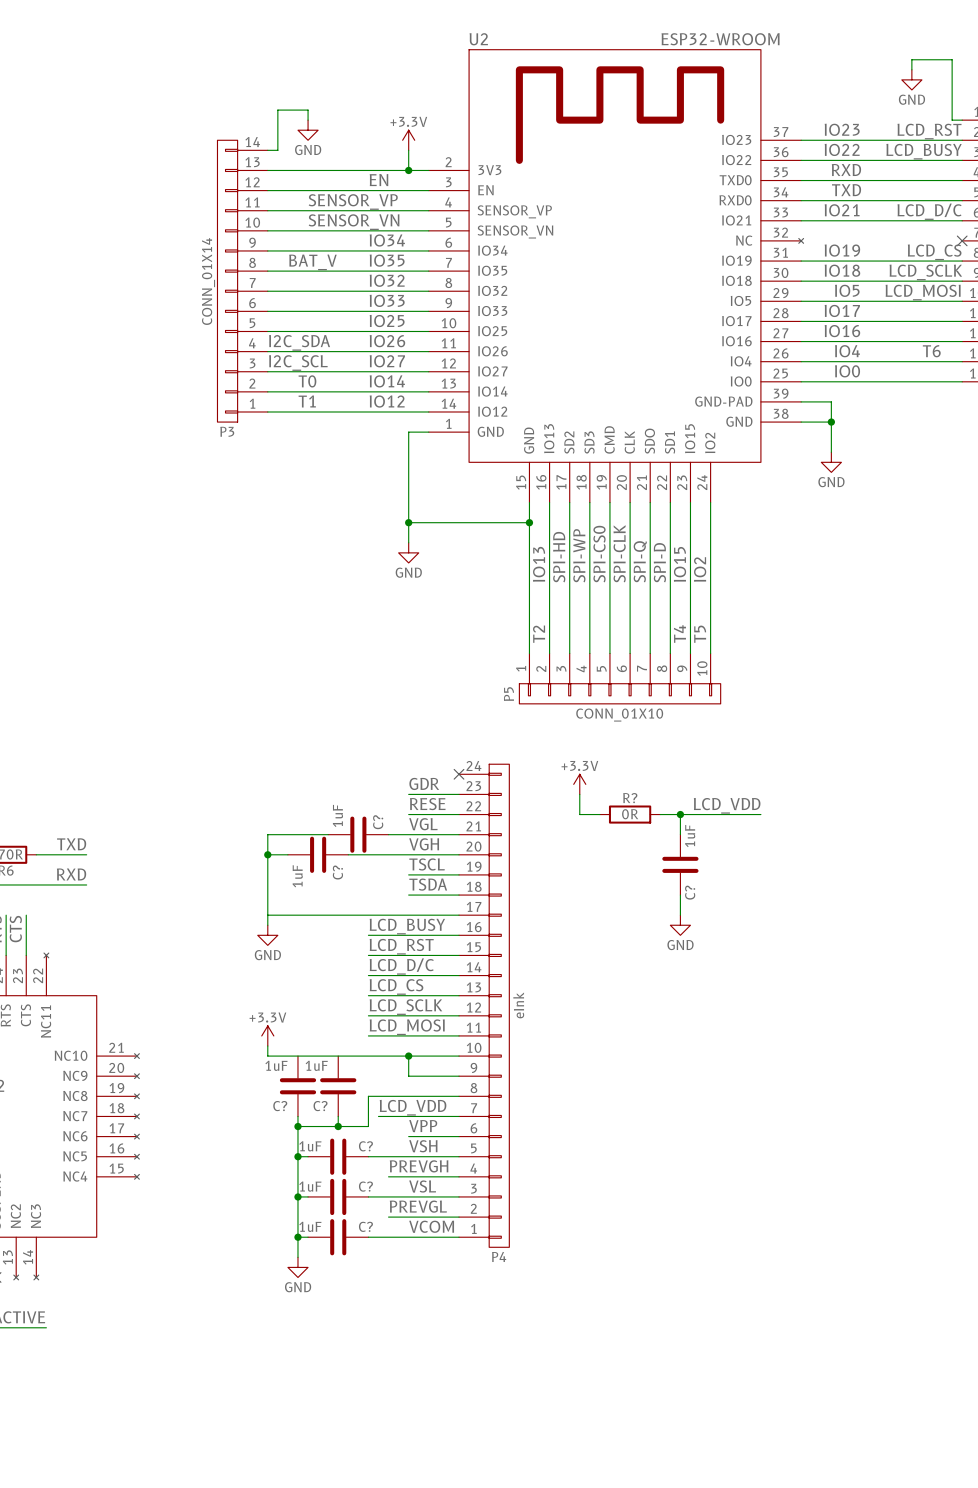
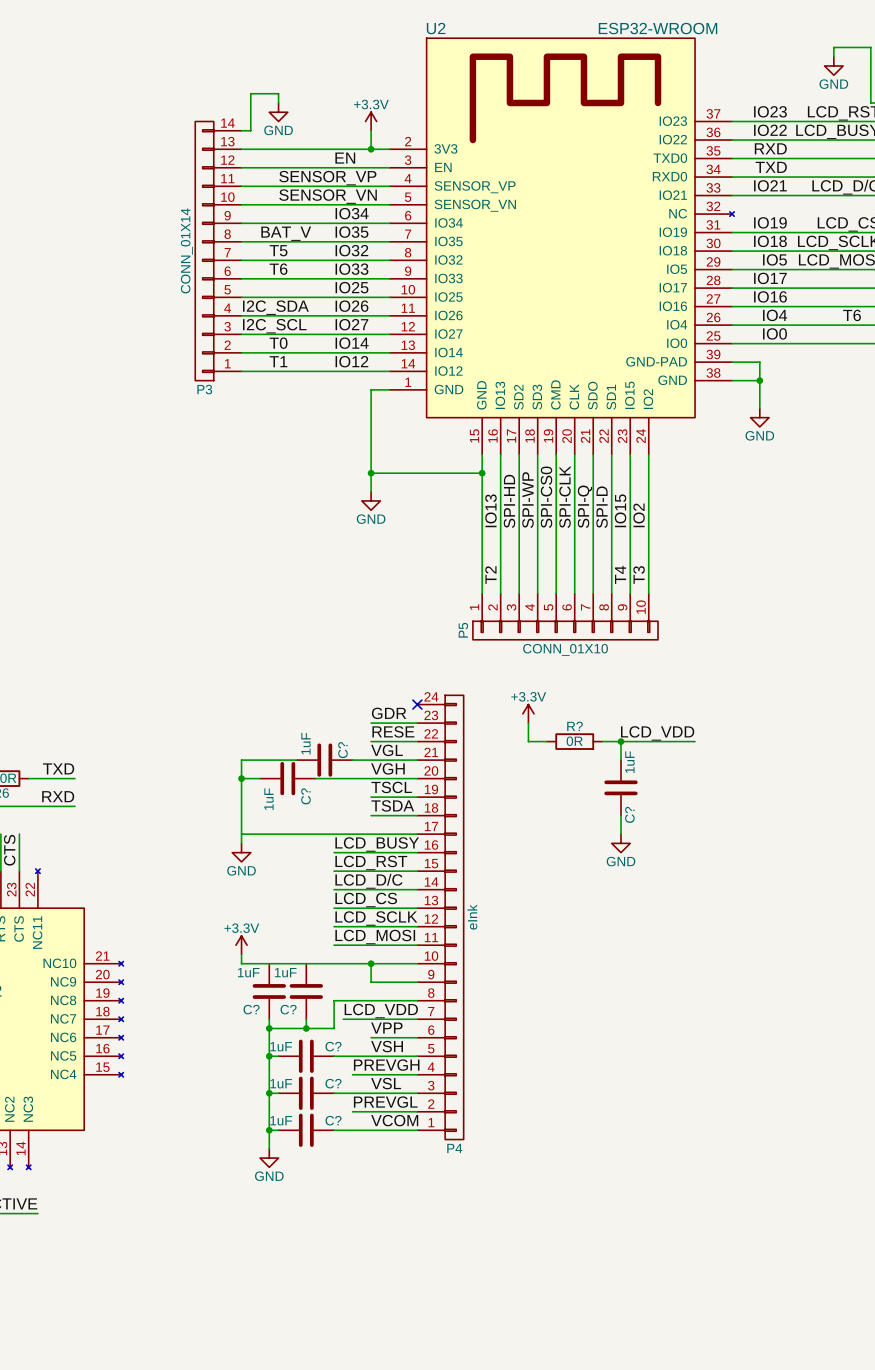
label: none -> T5 (278, 250)
label: none -> T6 (278, 269)
label: T5 (700, 634) -> T3 (639, 575)

